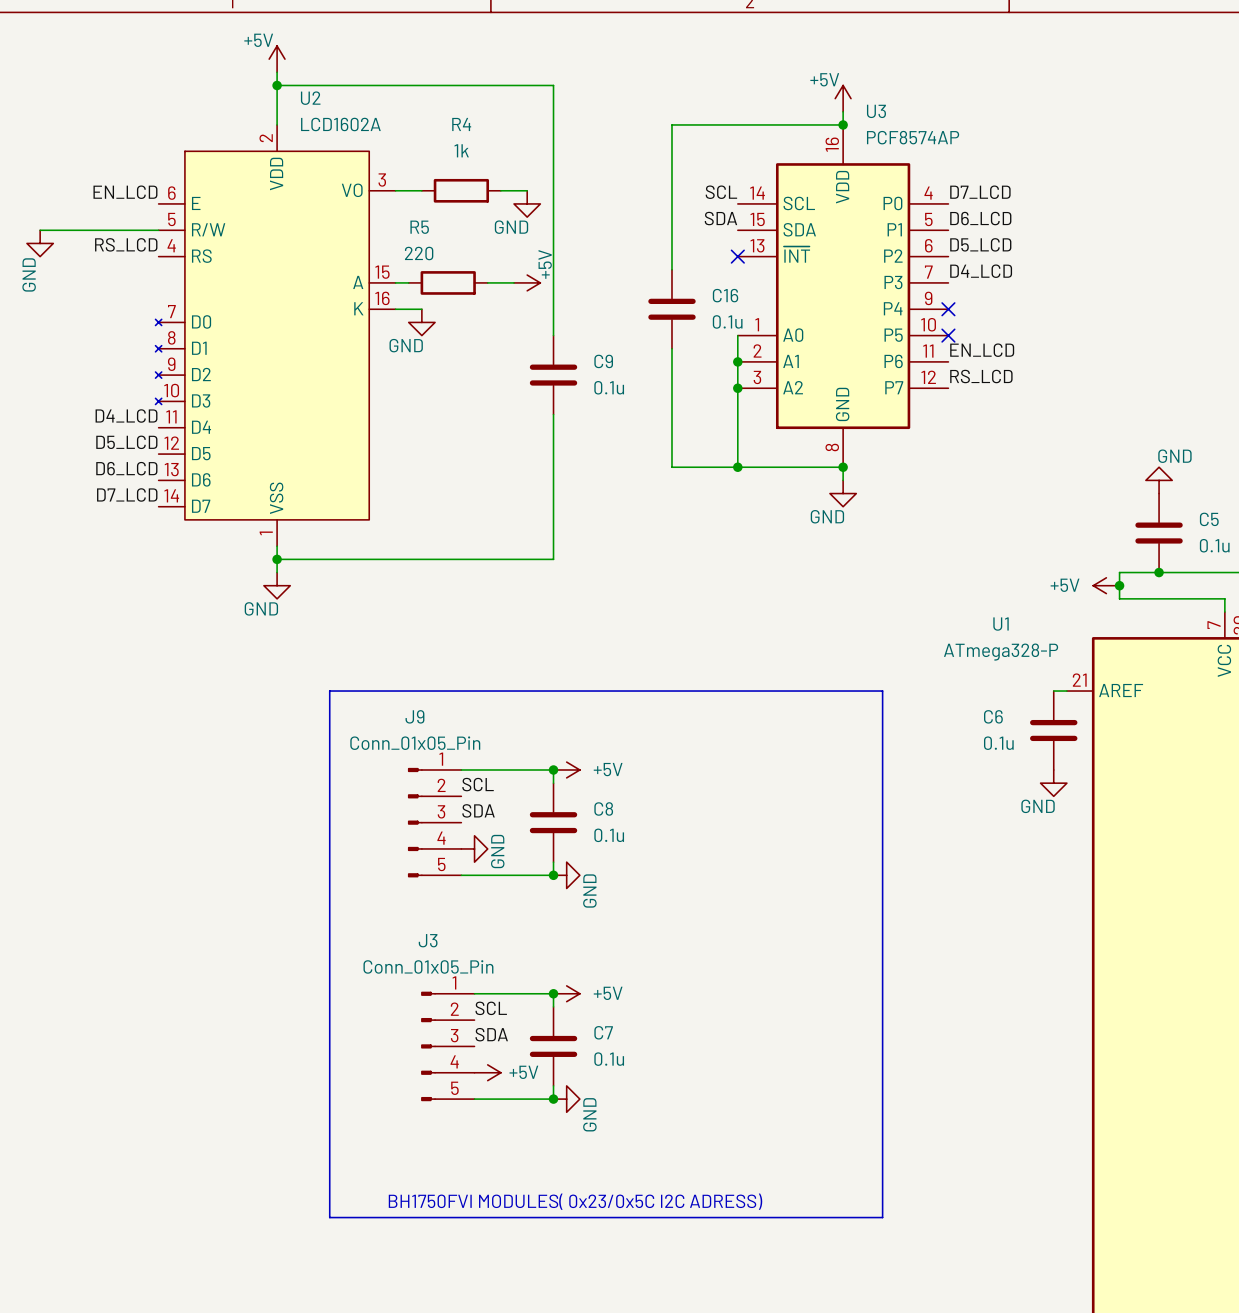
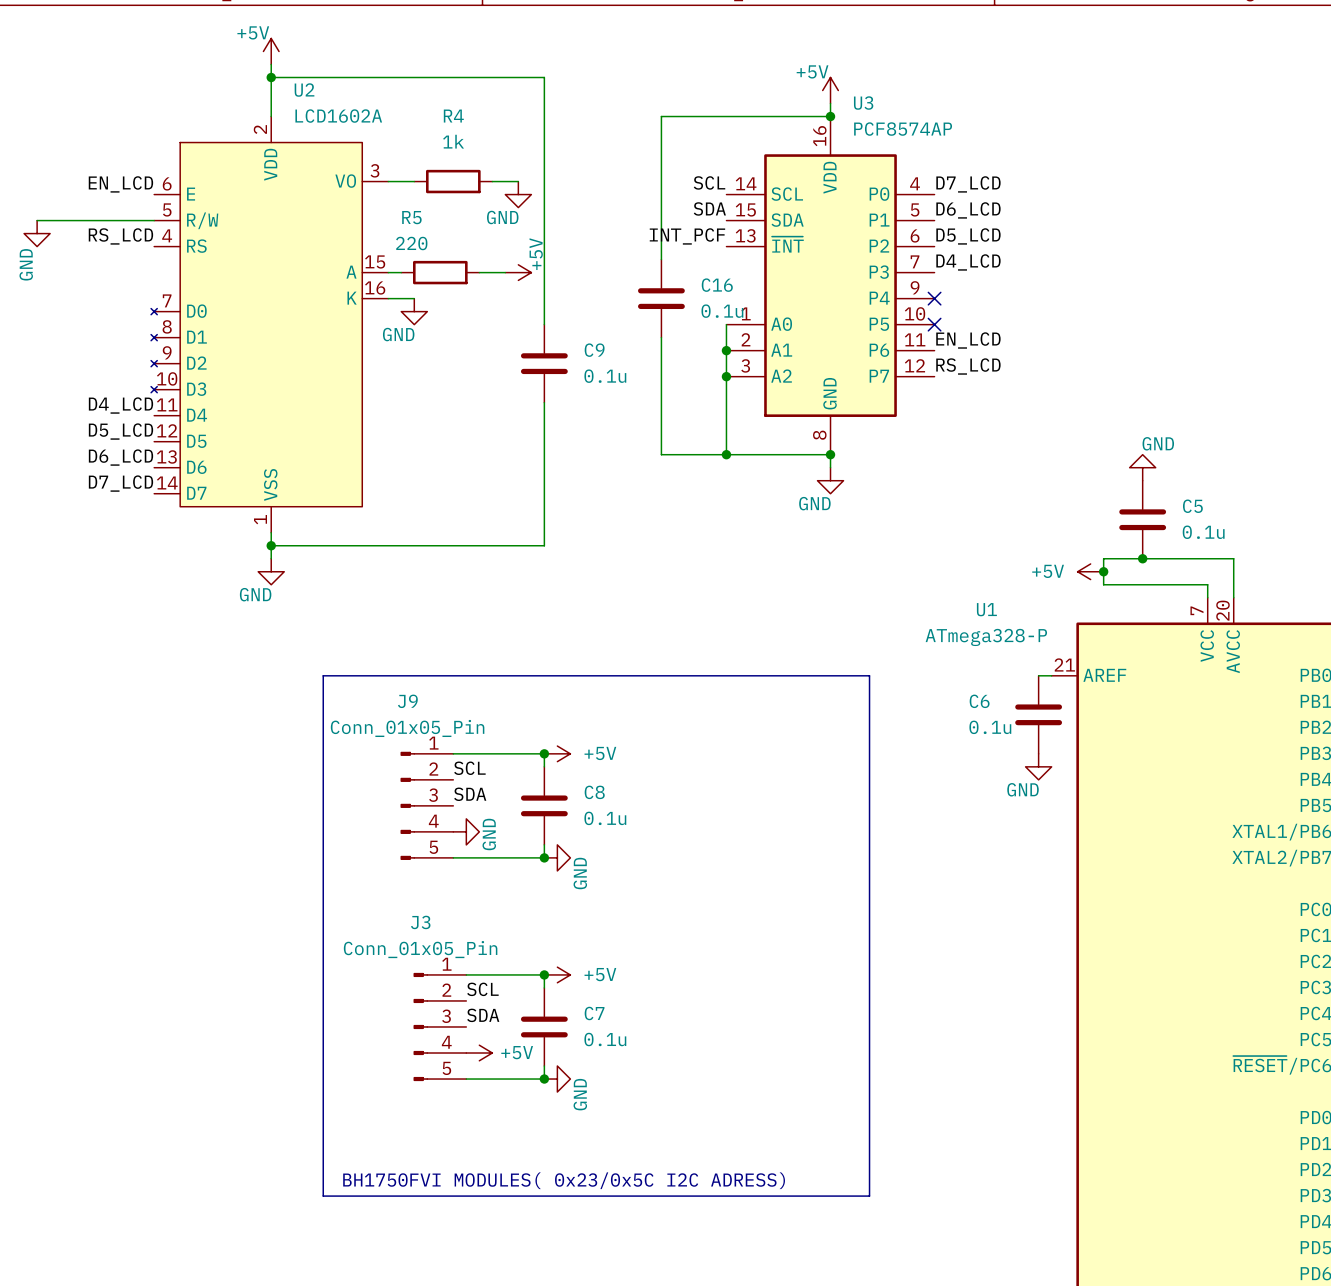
label: none -> INT_PCF (687, 236)
no-connect mark: (737, 256) -> none

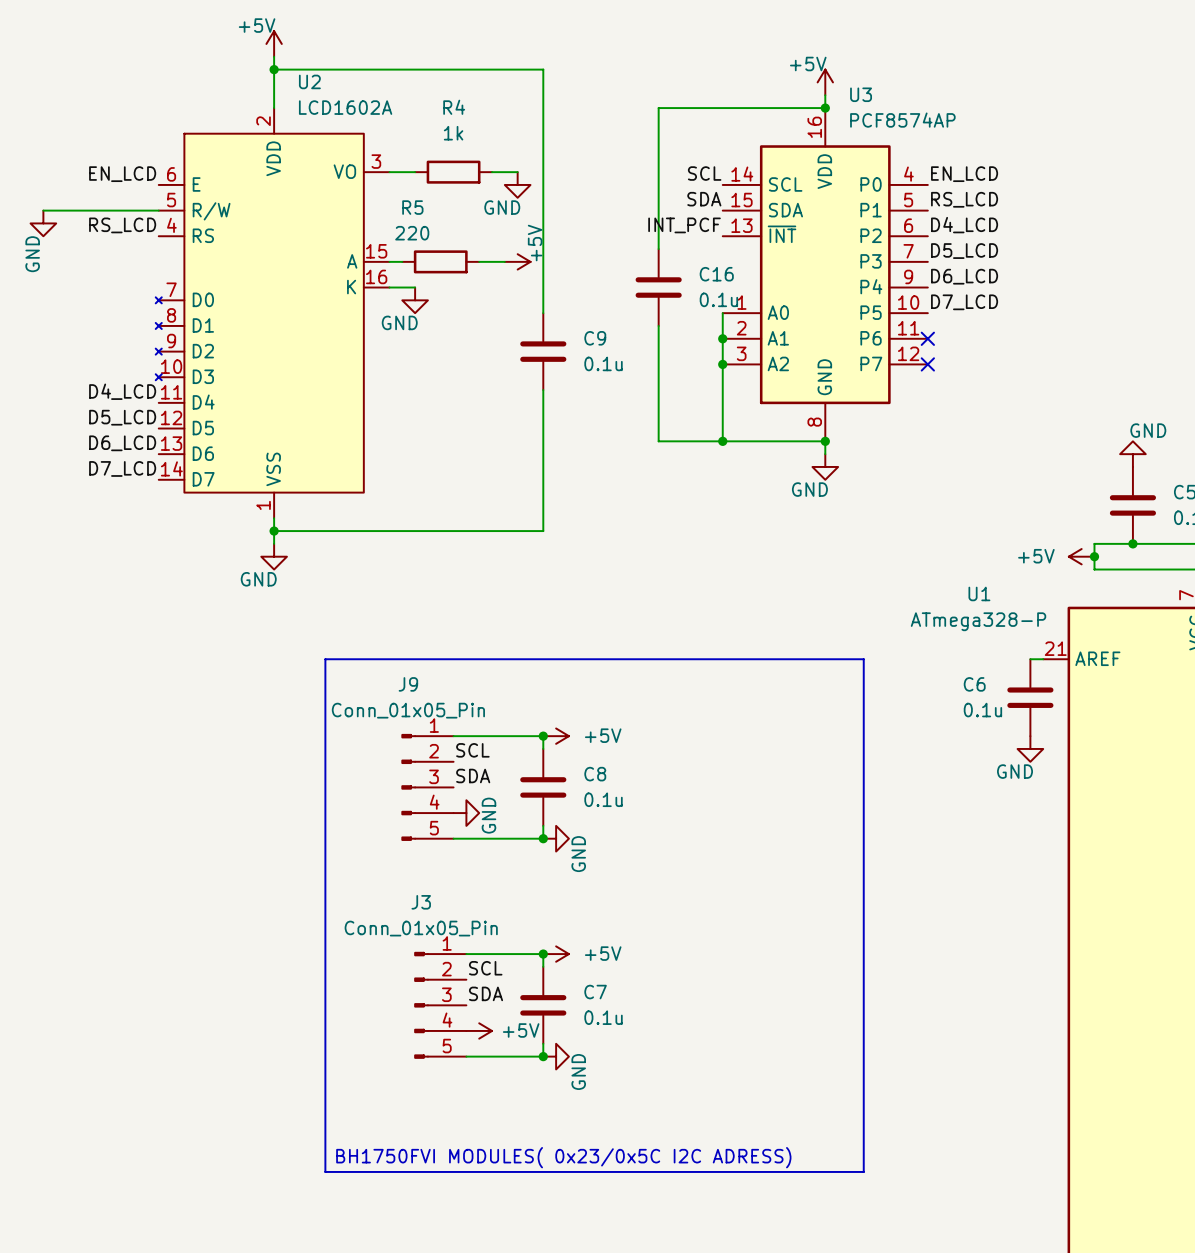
label: D7_LCD (968, 184) -> EN_LCD (964, 174)
label: D6_LCD (968, 210) -> RS_LCD (964, 199)
label: D5_LCD (968, 236) -> D4_LCD (964, 225)
label: D4_LCD (968, 262) -> D5_LCD (964, 251)
label: none -> D6_LCD (964, 276)
no-connect mark: (934, 298) -> none
no-connect mark: (934, 324) -> none
label: EN_LCD (968, 340) -> D7_LCD (964, 302)
no-connect mark: none -> (927, 338)
label: RS_LCD (968, 366) -> none
no-connect mark: none -> (927, 364)

